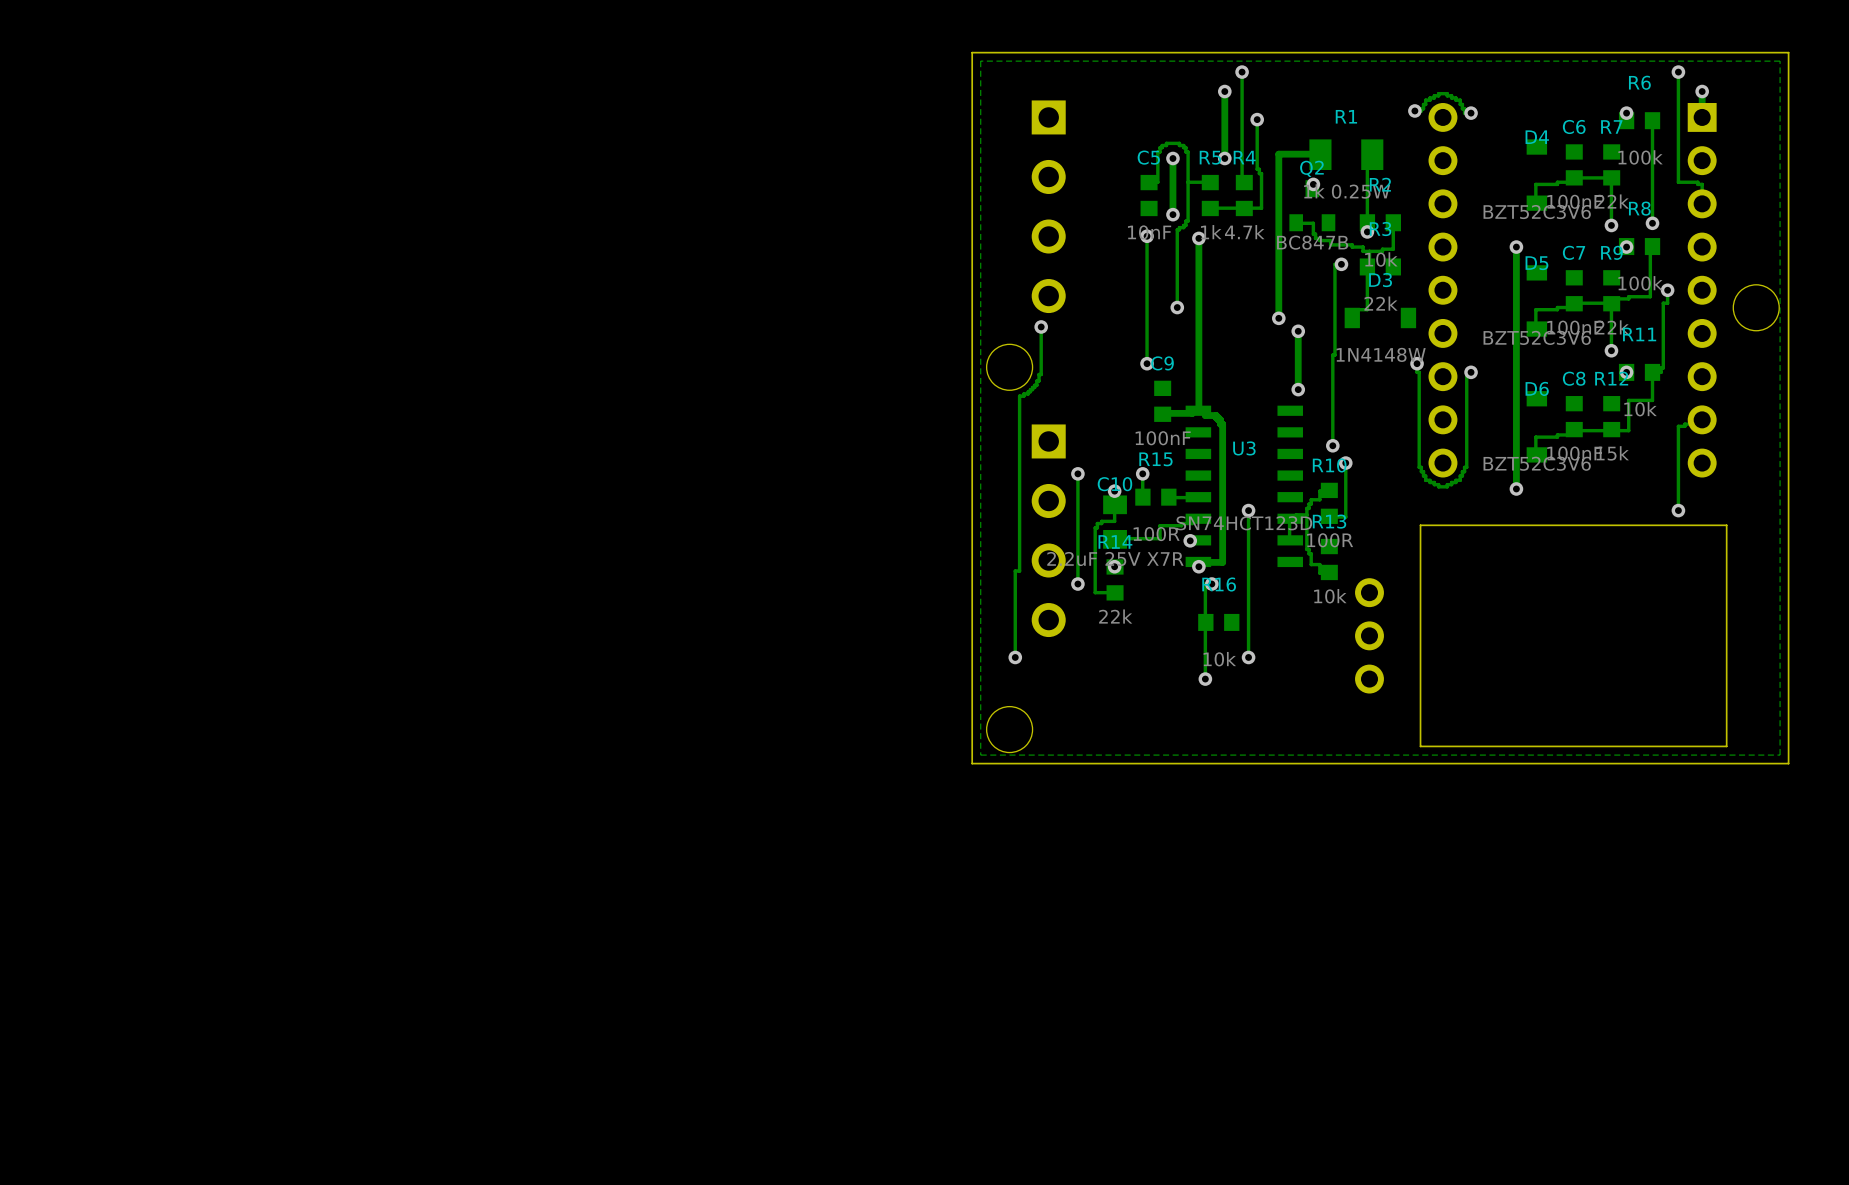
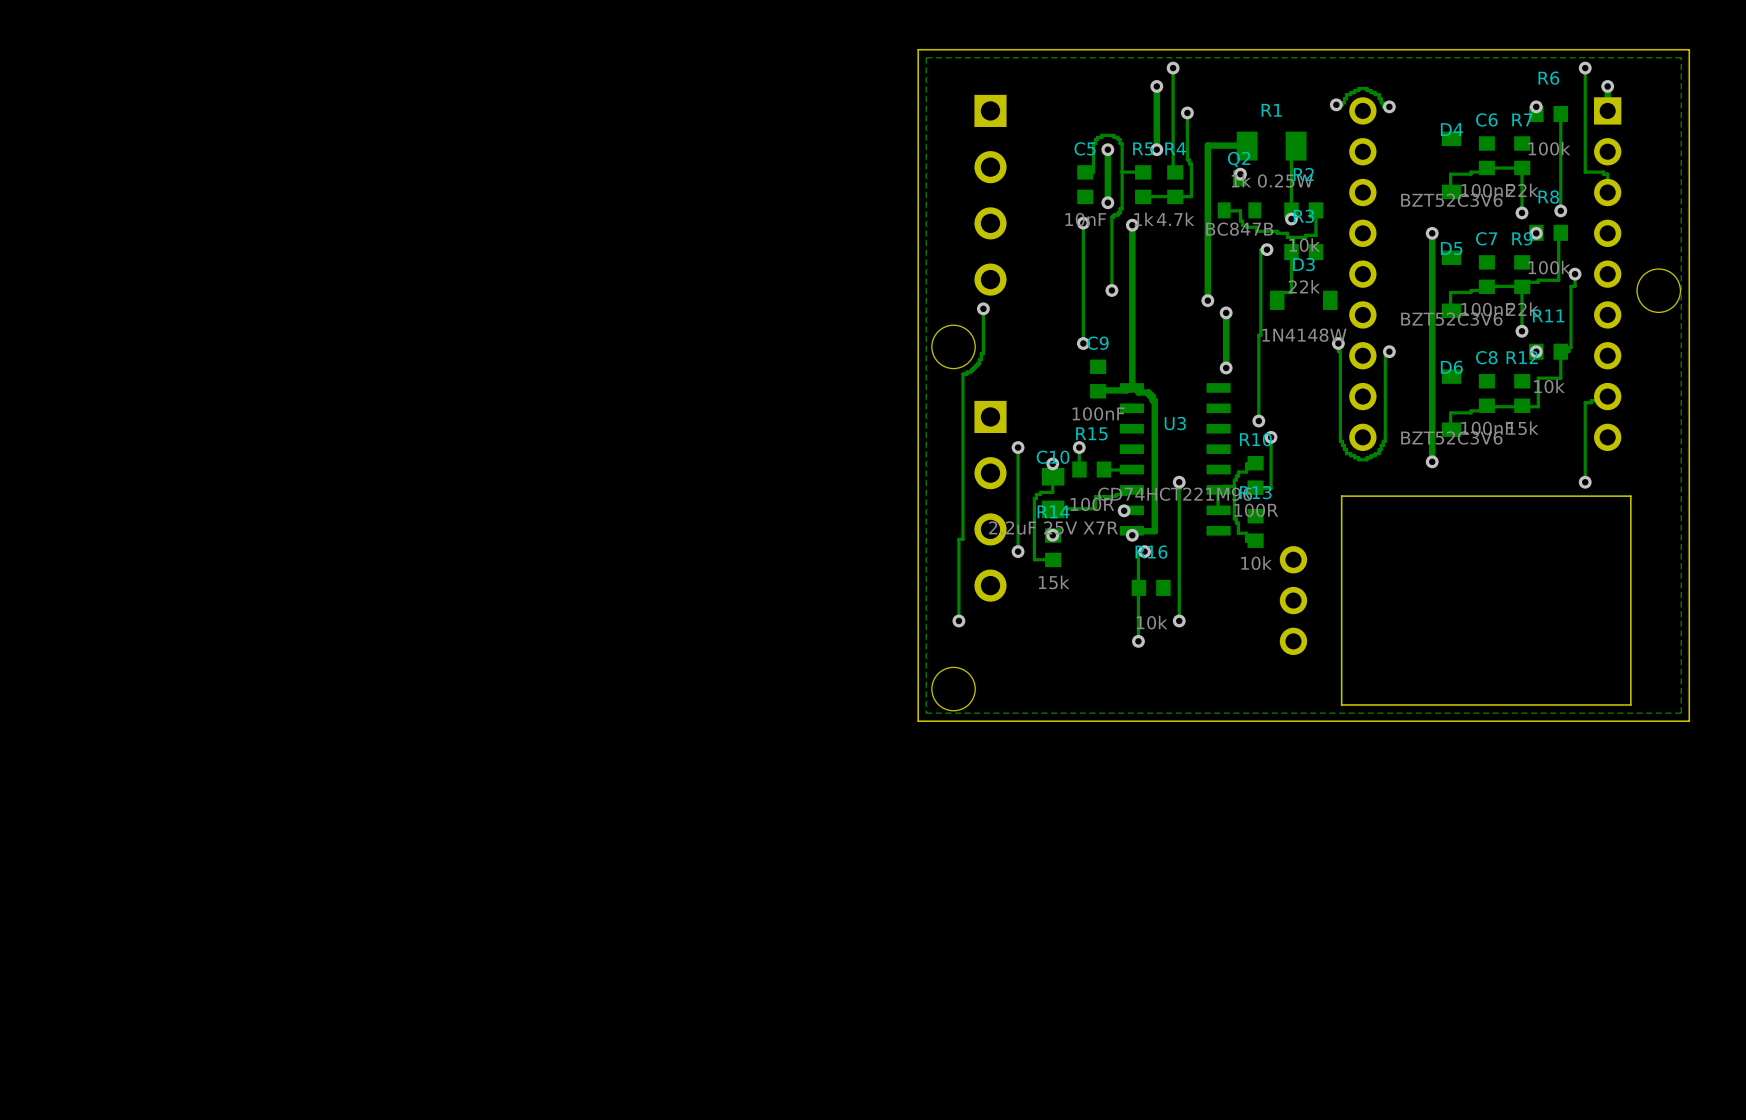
U3 value: SN74HCT123D (1244, 523) -> CD74HCT221M96 (1175, 494)
R14 value: 22k (1115, 616) -> 15k (1054, 582)

